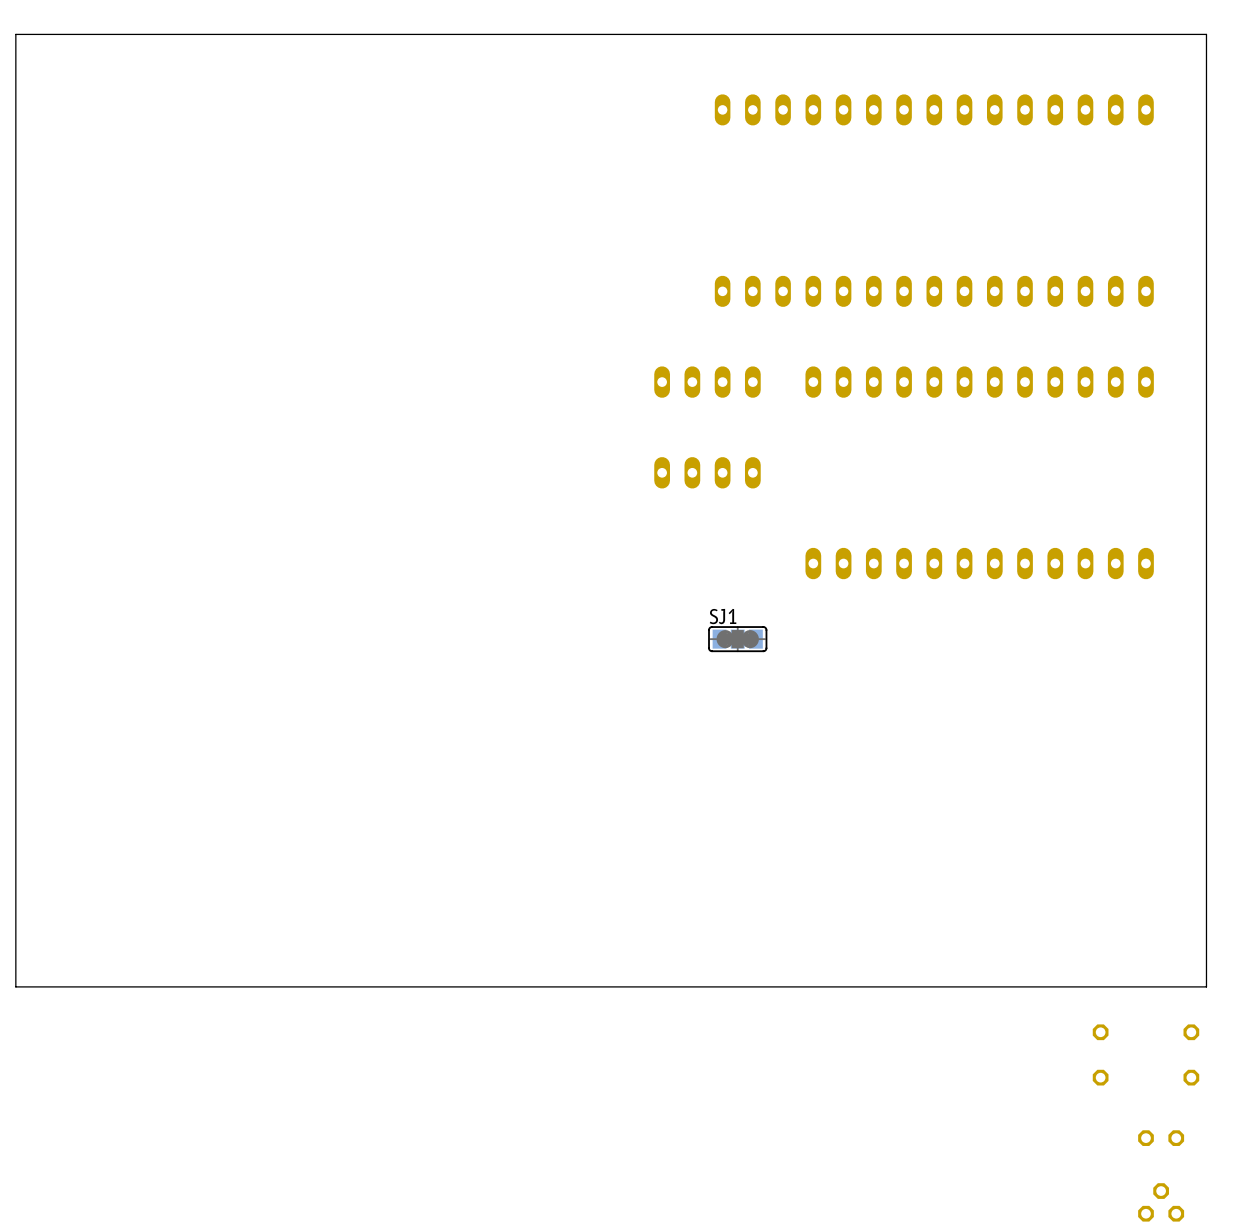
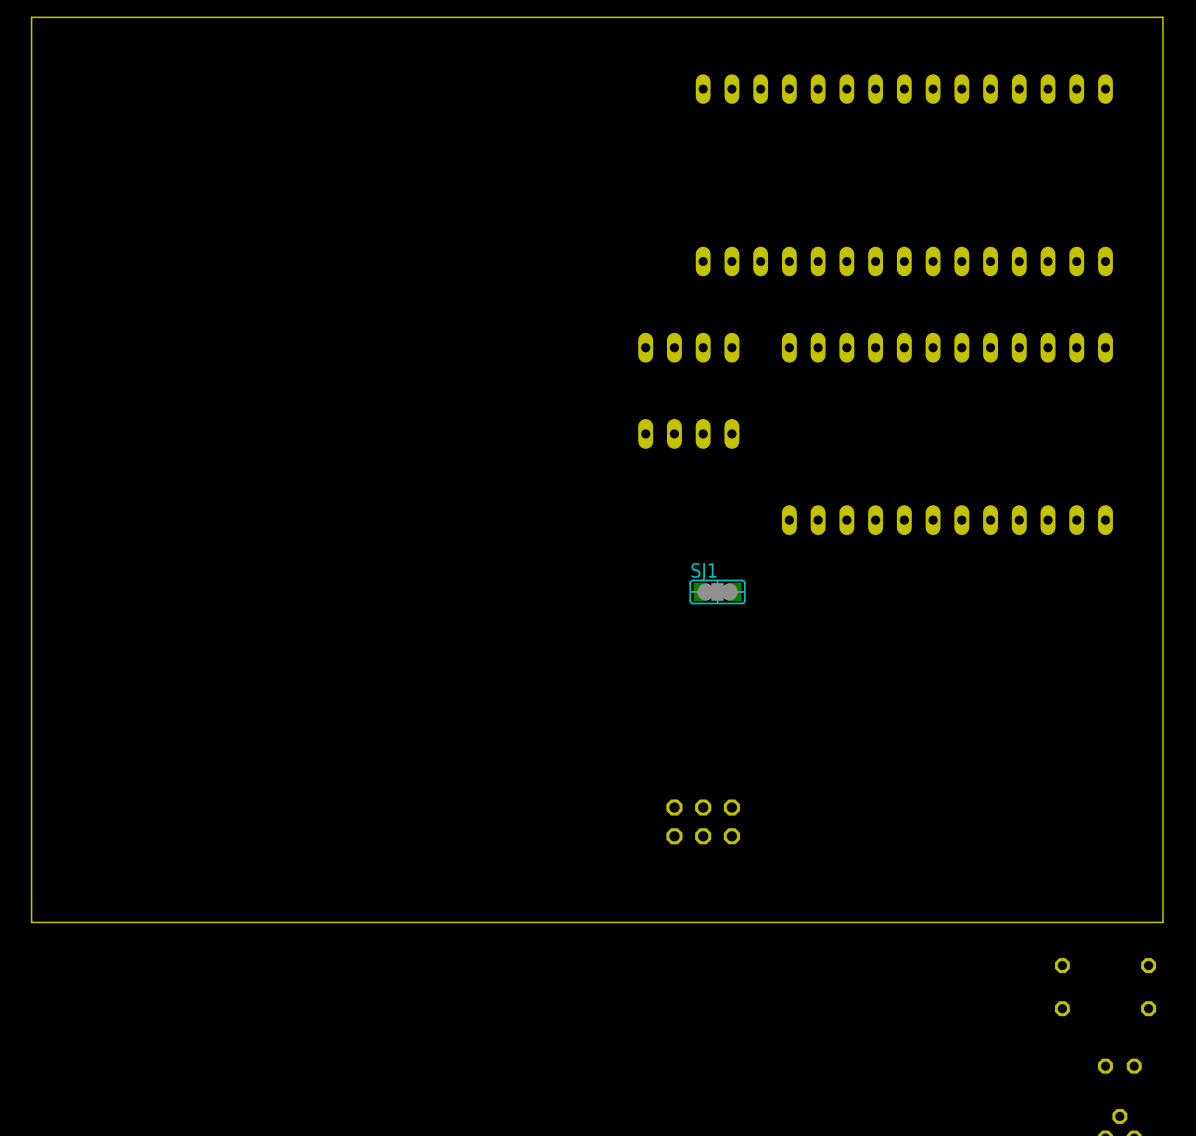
part: none -> (703, 821)

